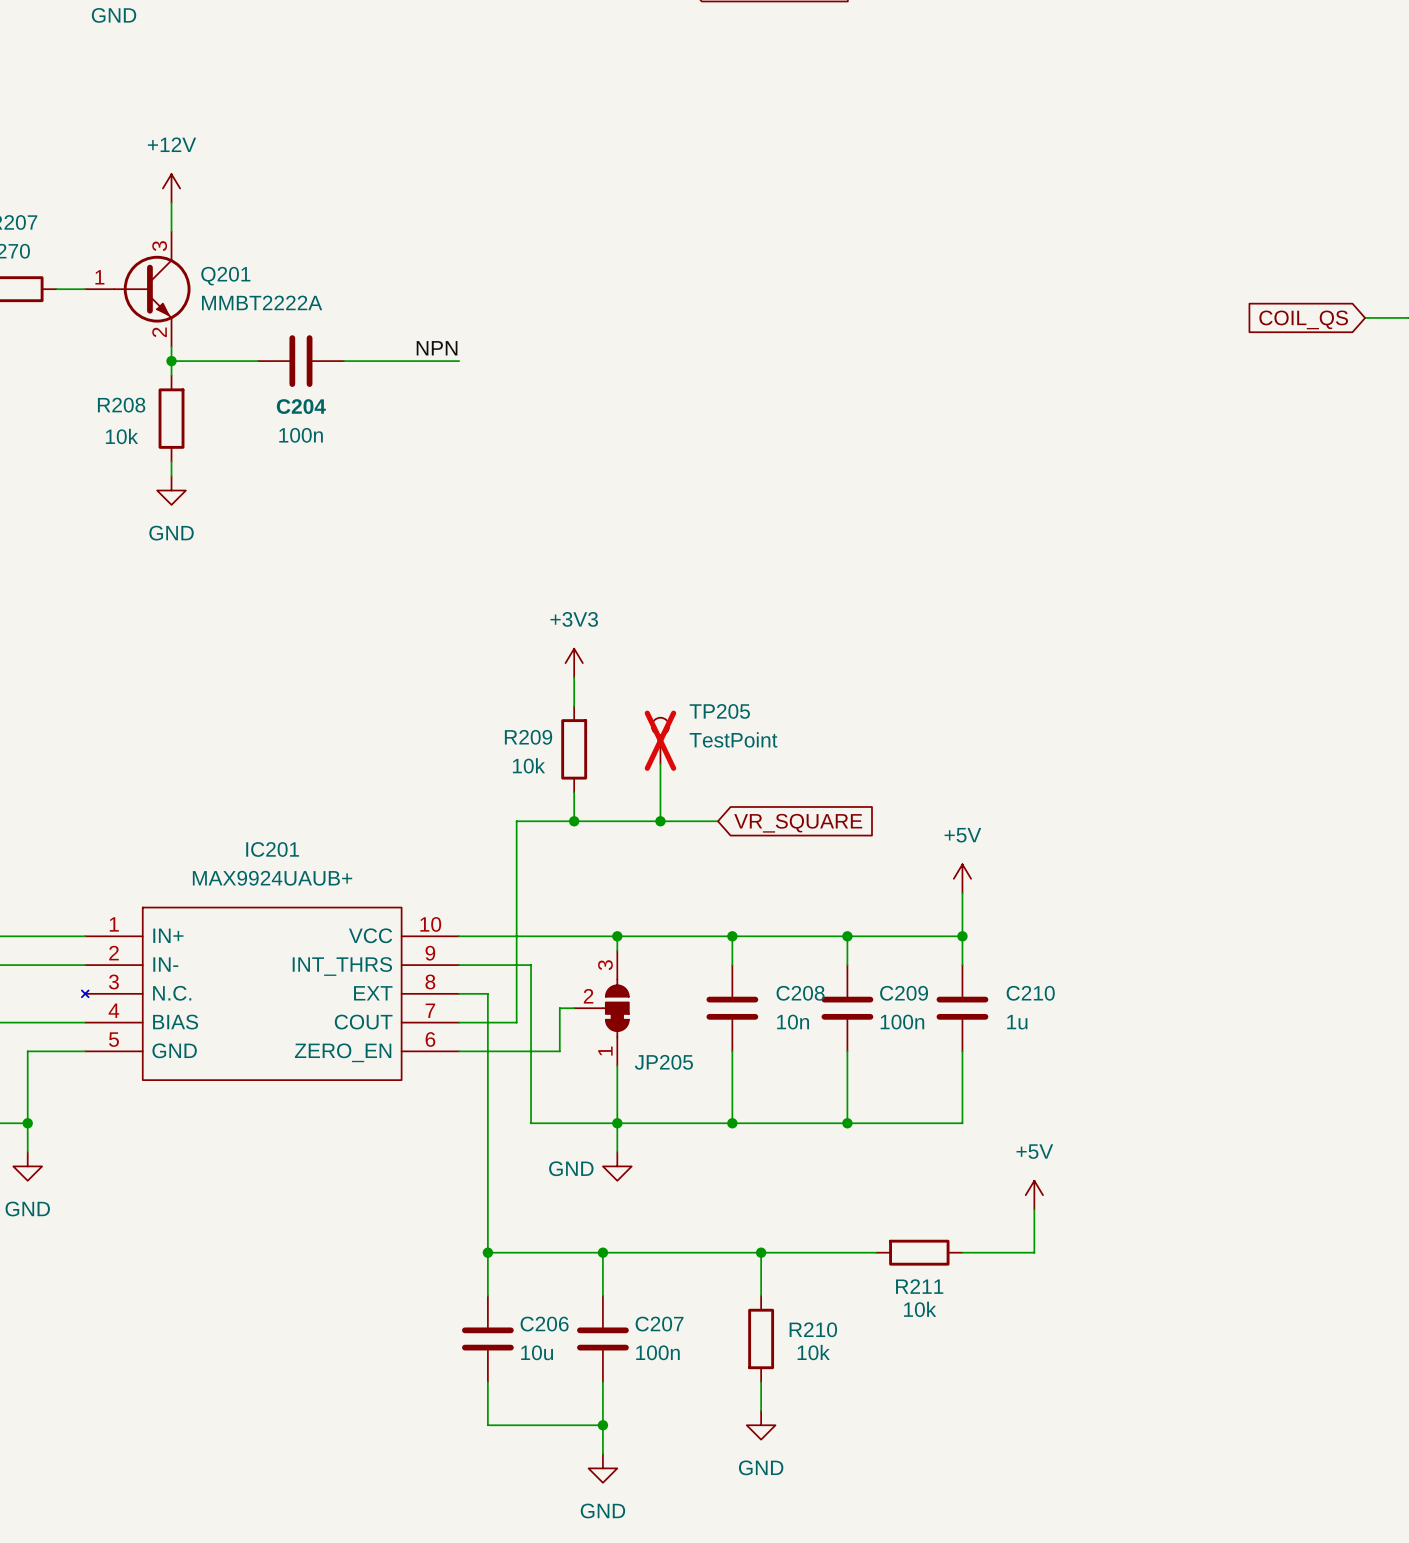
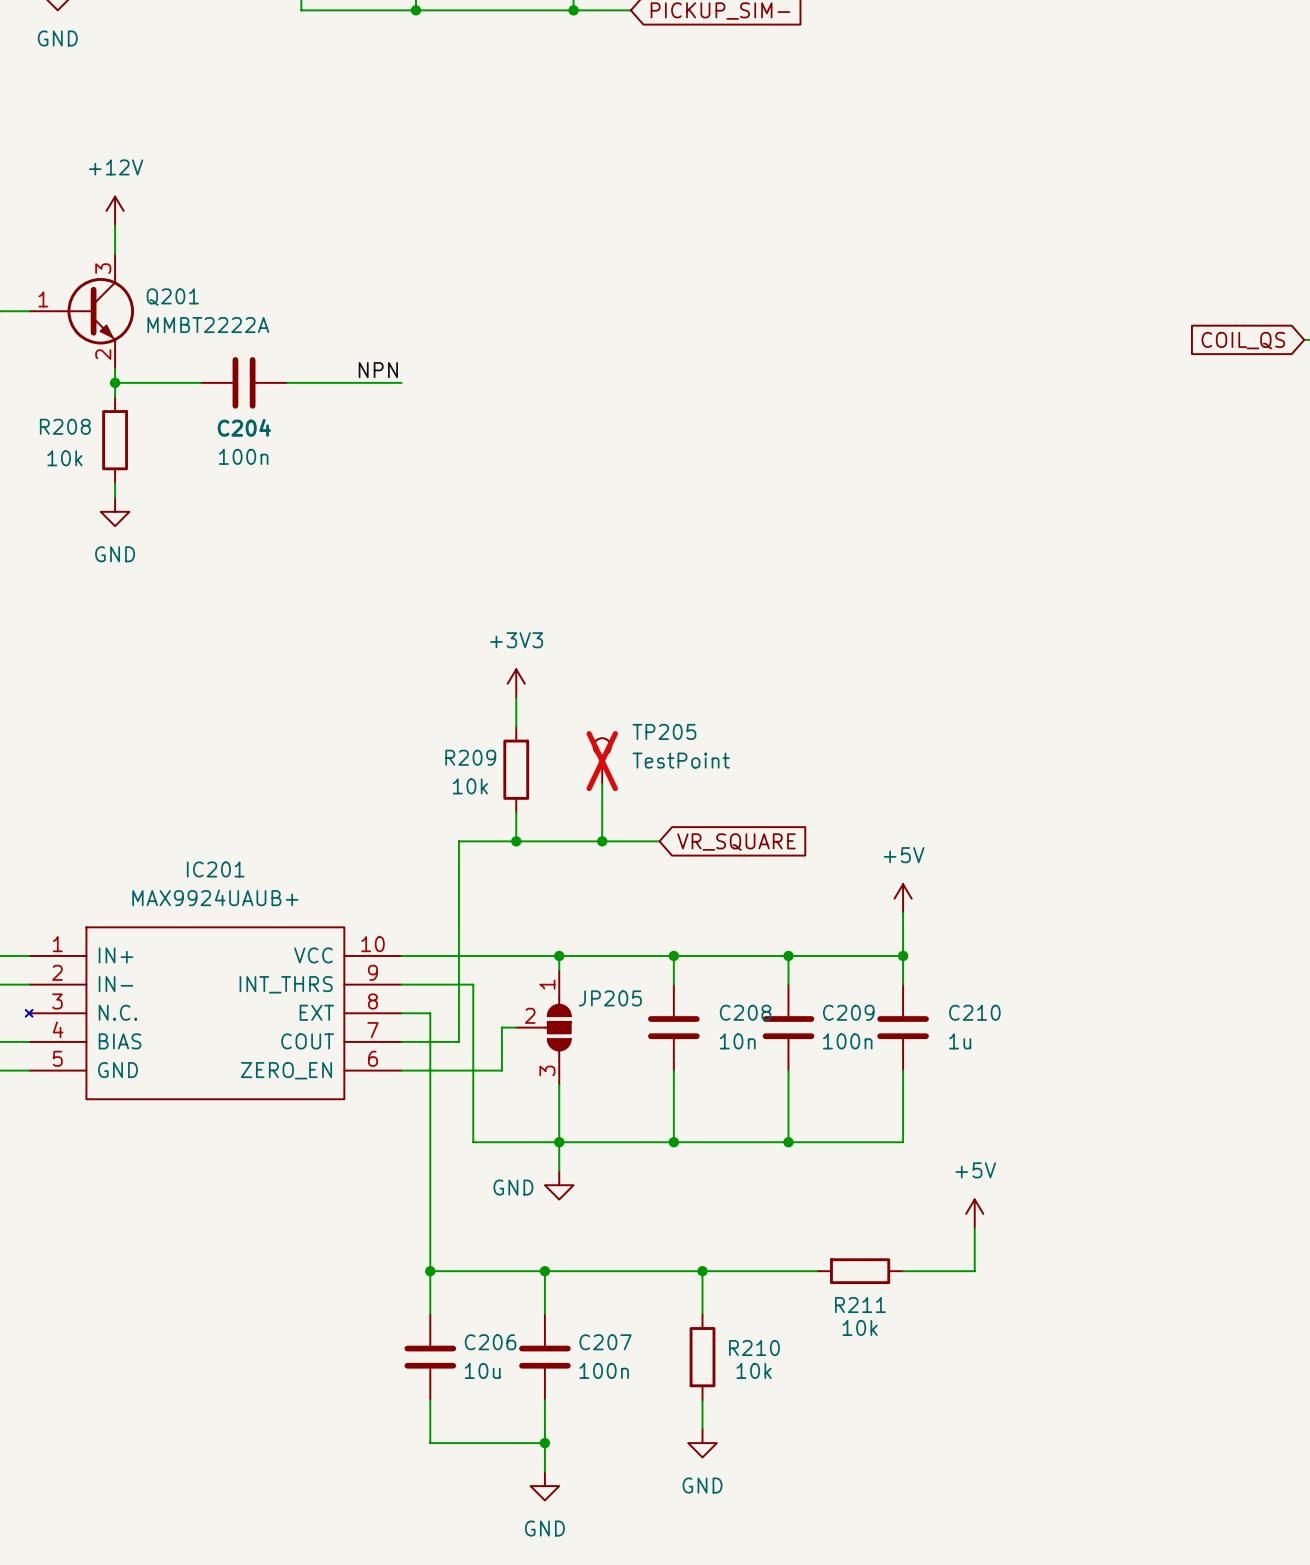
JP205 symbol: [574, 950, 629, 1066] -> [516, 970, 571, 1085]
JP205 name position: JP205 (663, 1062) -> JP205 (610, 998)

